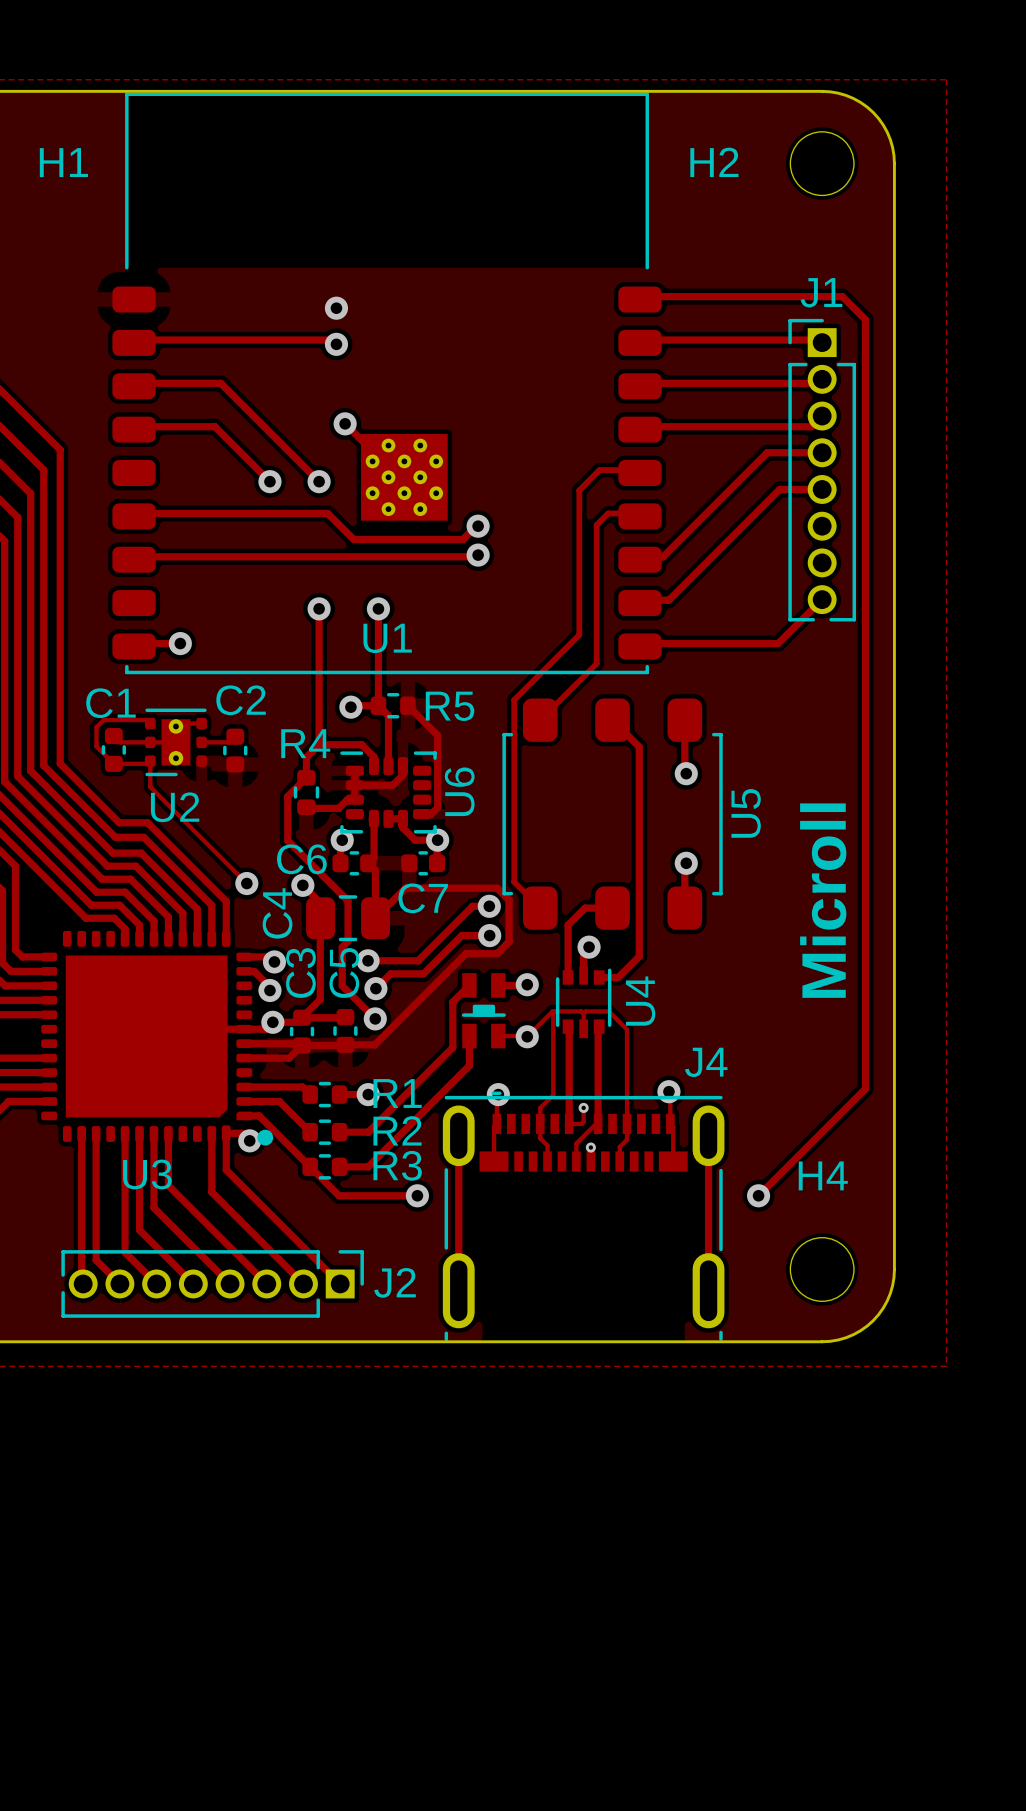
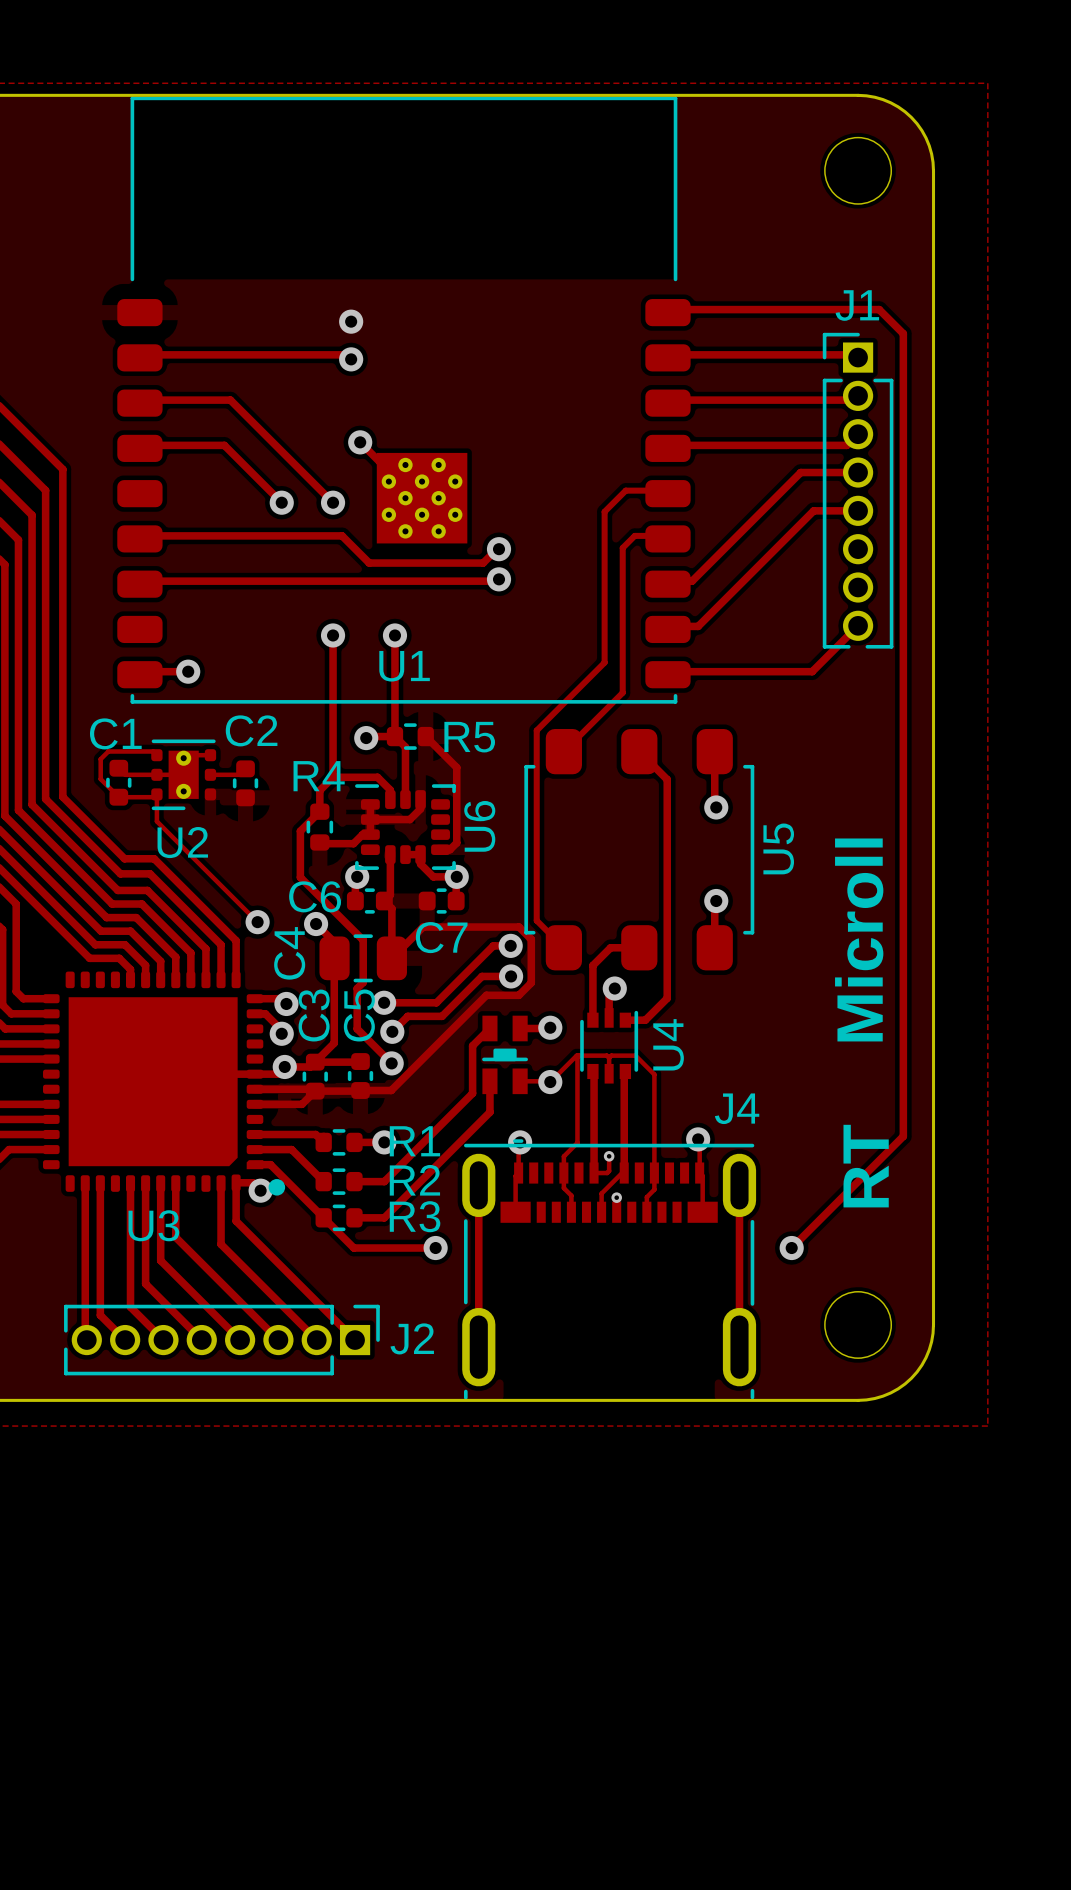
H1 name: H1 (63, 162) -> none
H2 name: H2 (714, 162) -> none
text: none -> RT (866, 1166)
H4 name: H4 (823, 1175) -> none

